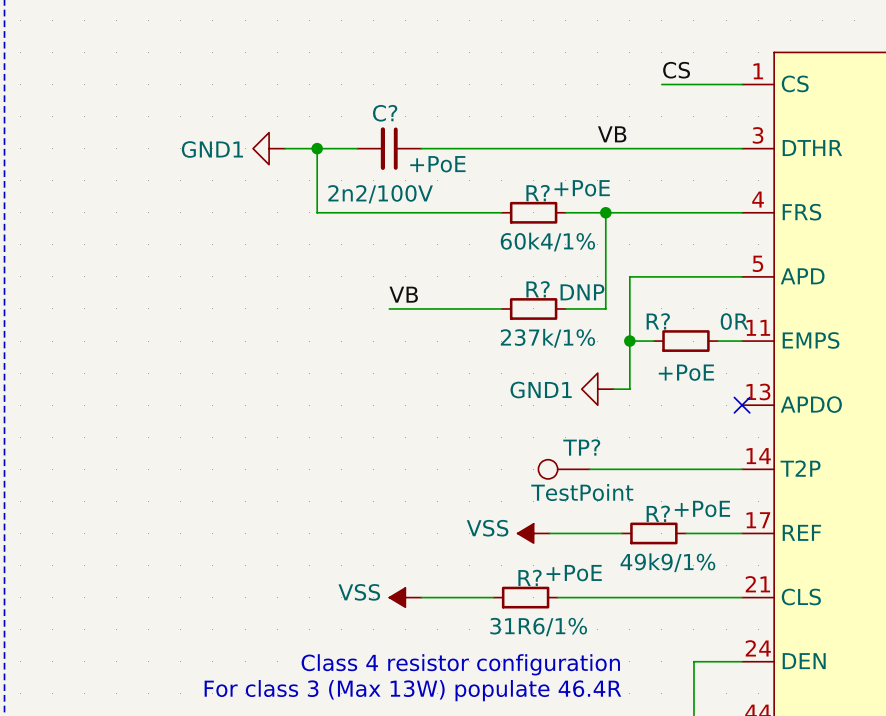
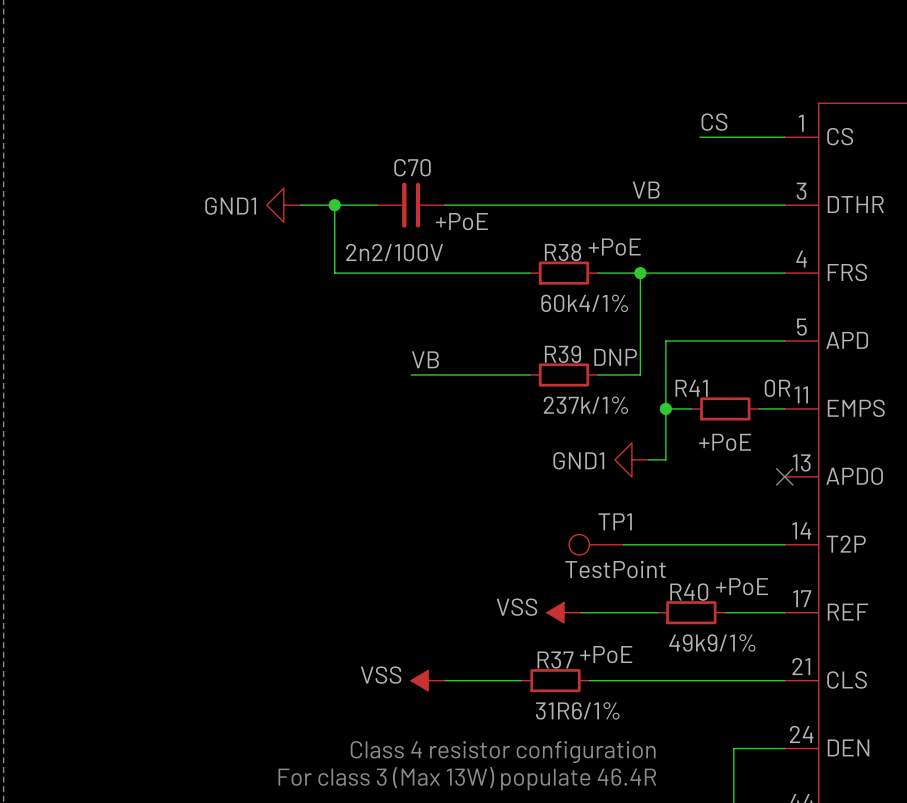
C? name: C? (385, 113) -> C70 (412, 167)
R? name: R? (538, 193) -> R38 (562, 252)
R? name: R? (538, 289) -> R39 (562, 354)
R? name: R? (658, 321) -> R41 (691, 388)
TP? name: TP? (581, 447) -> TP1 (615, 521)
R? name: R? (658, 513) -> R40 (689, 592)
R? name: R? (530, 577) -> R37 (555, 660)

